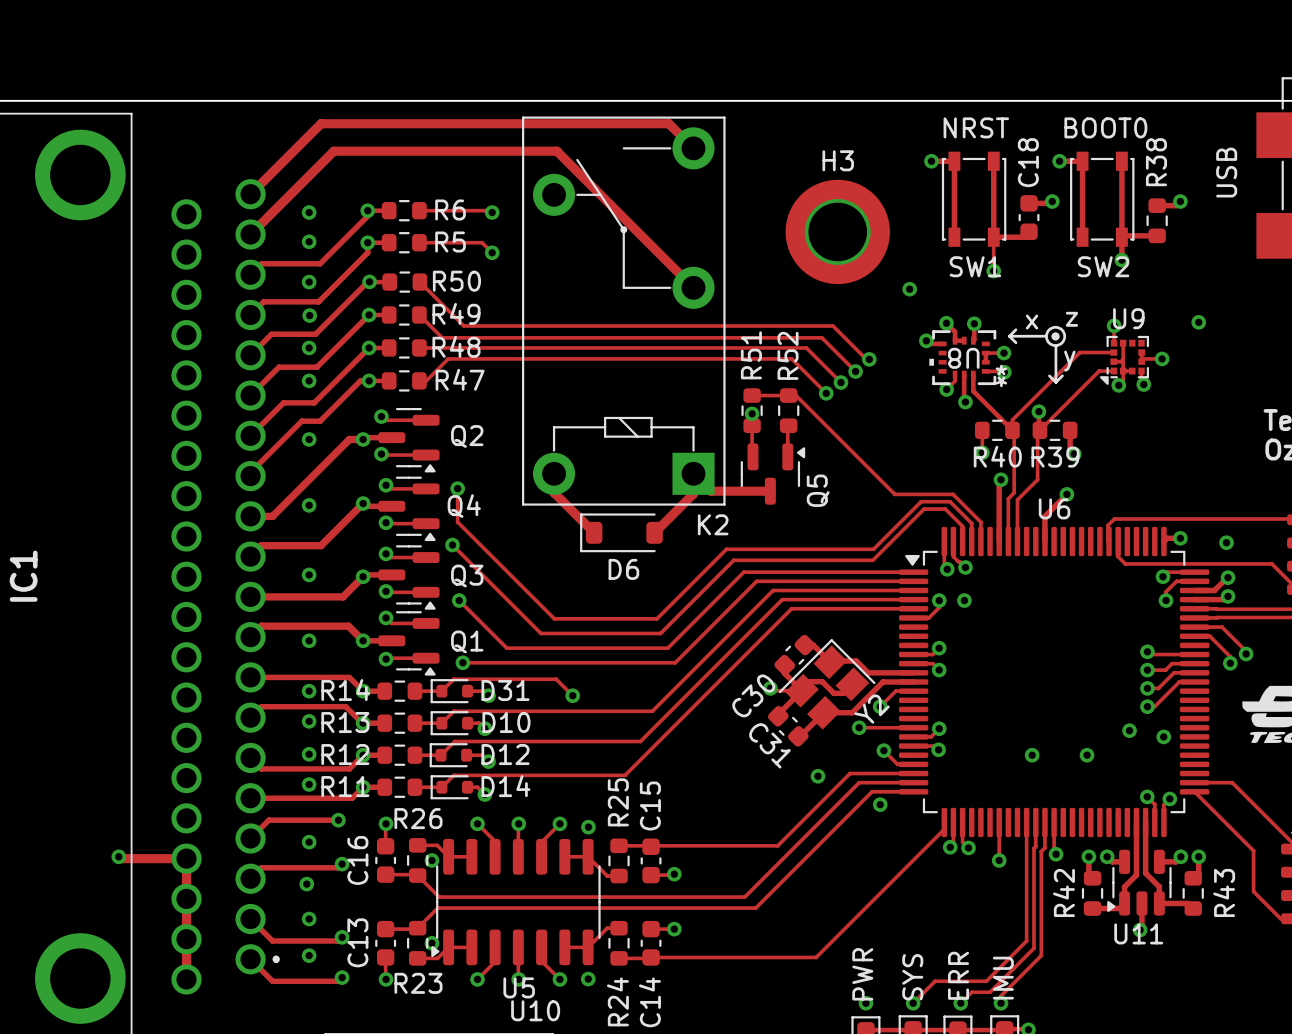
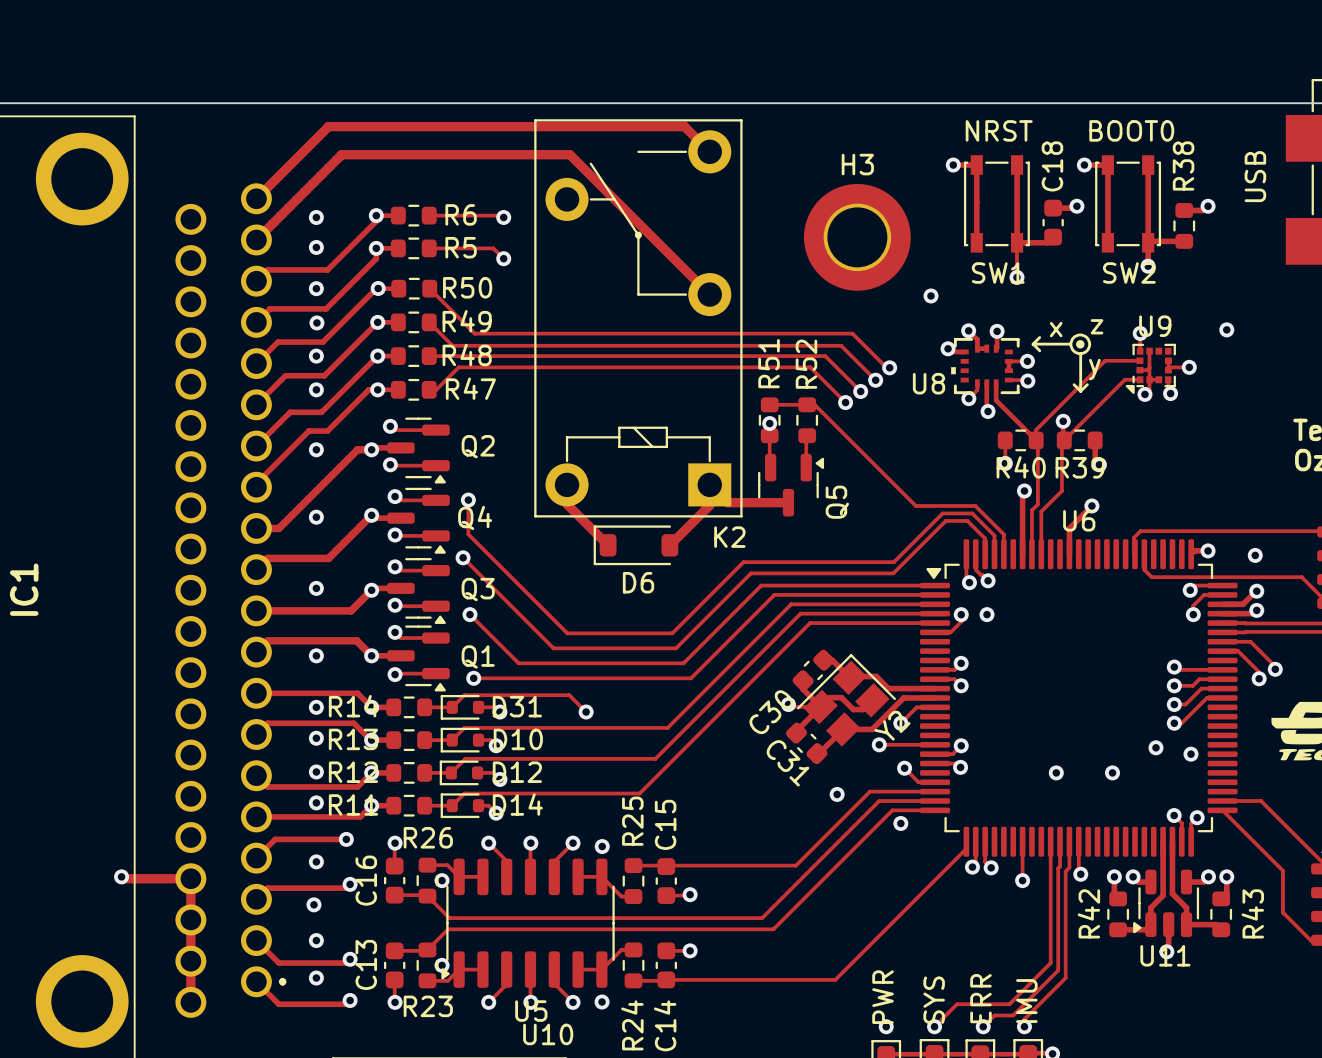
U8 footprint: [929, 330, 997, 386] -> [951, 337, 1020, 395]
U8 name position: U8 (963, 358) -> U8 (929, 383)

